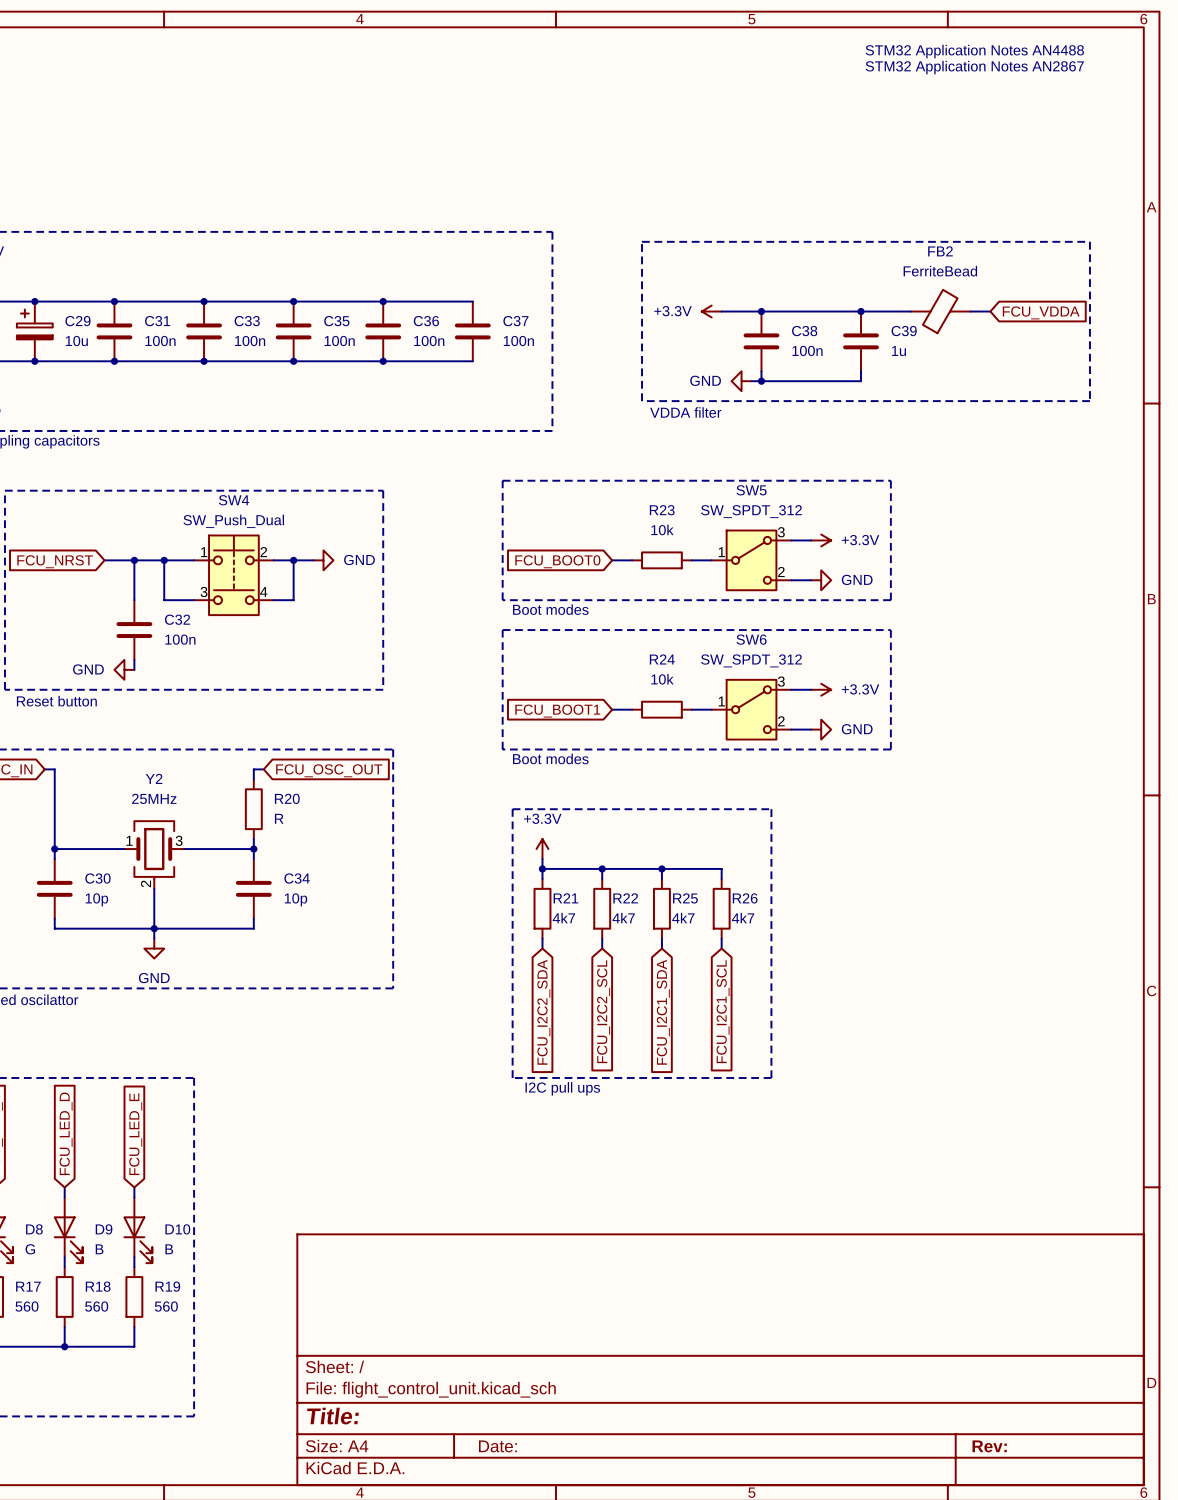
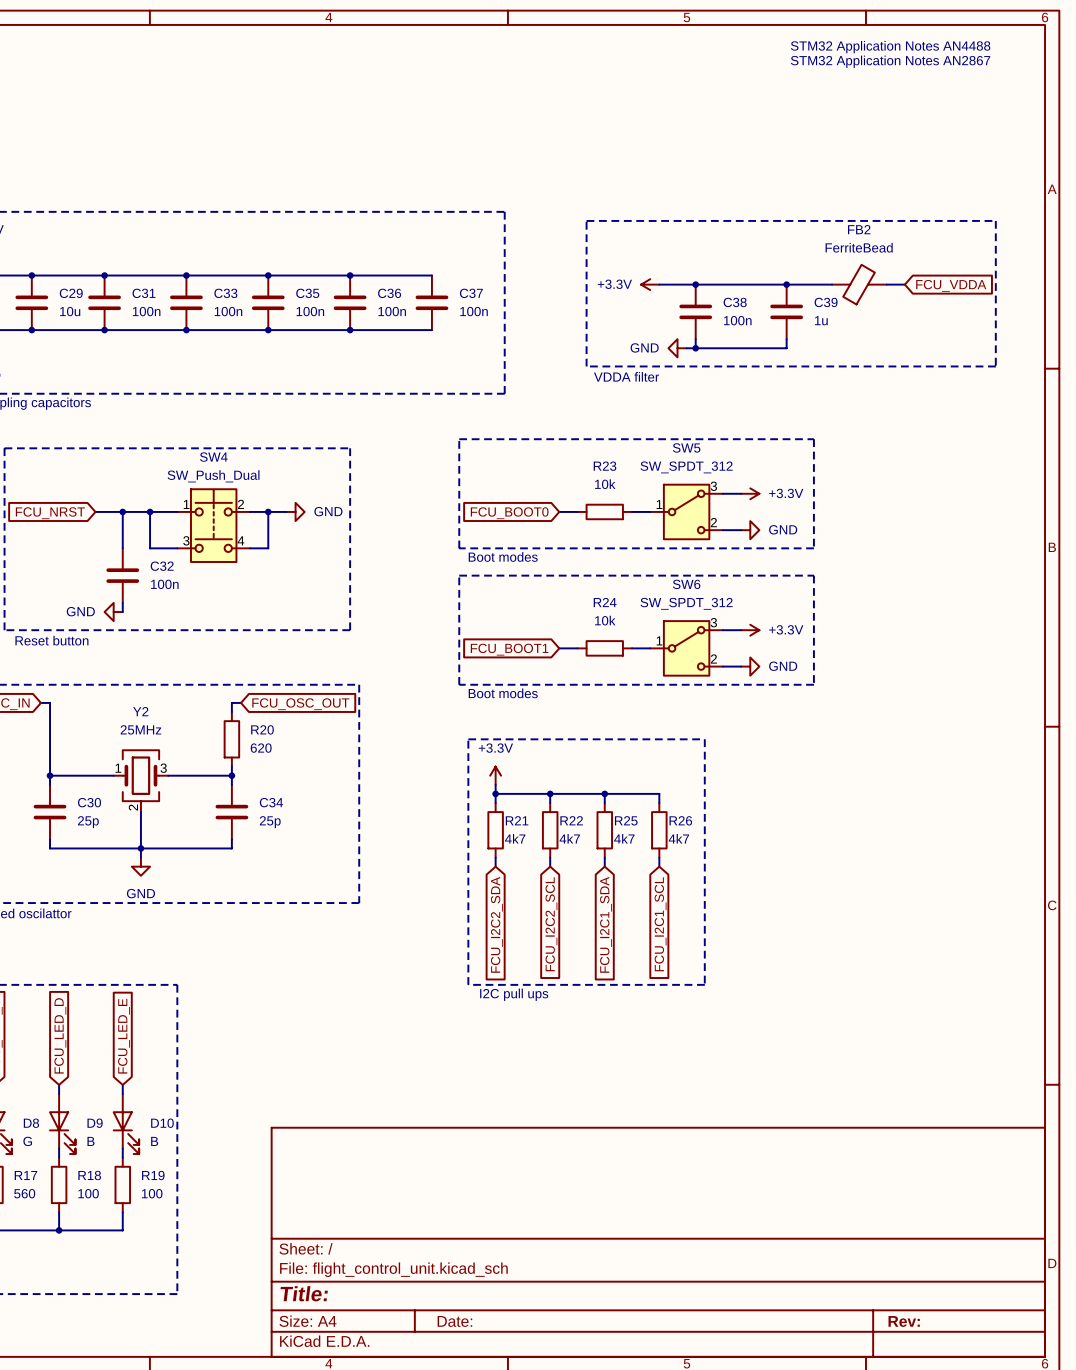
C29 symbol: [16, 301, 53, 362] -> [15, 275, 49, 331]
R20 value: R (279, 818) -> 620 (261, 748)
C30 value: 10p (96, 899) -> 25p (88, 822)
C34 value: 10p (296, 899) -> 25p (270, 822)
R18 value: 560 (96, 1306) -> 100 (88, 1193)
R19 value: 560 (166, 1306) -> 100 (152, 1193)

